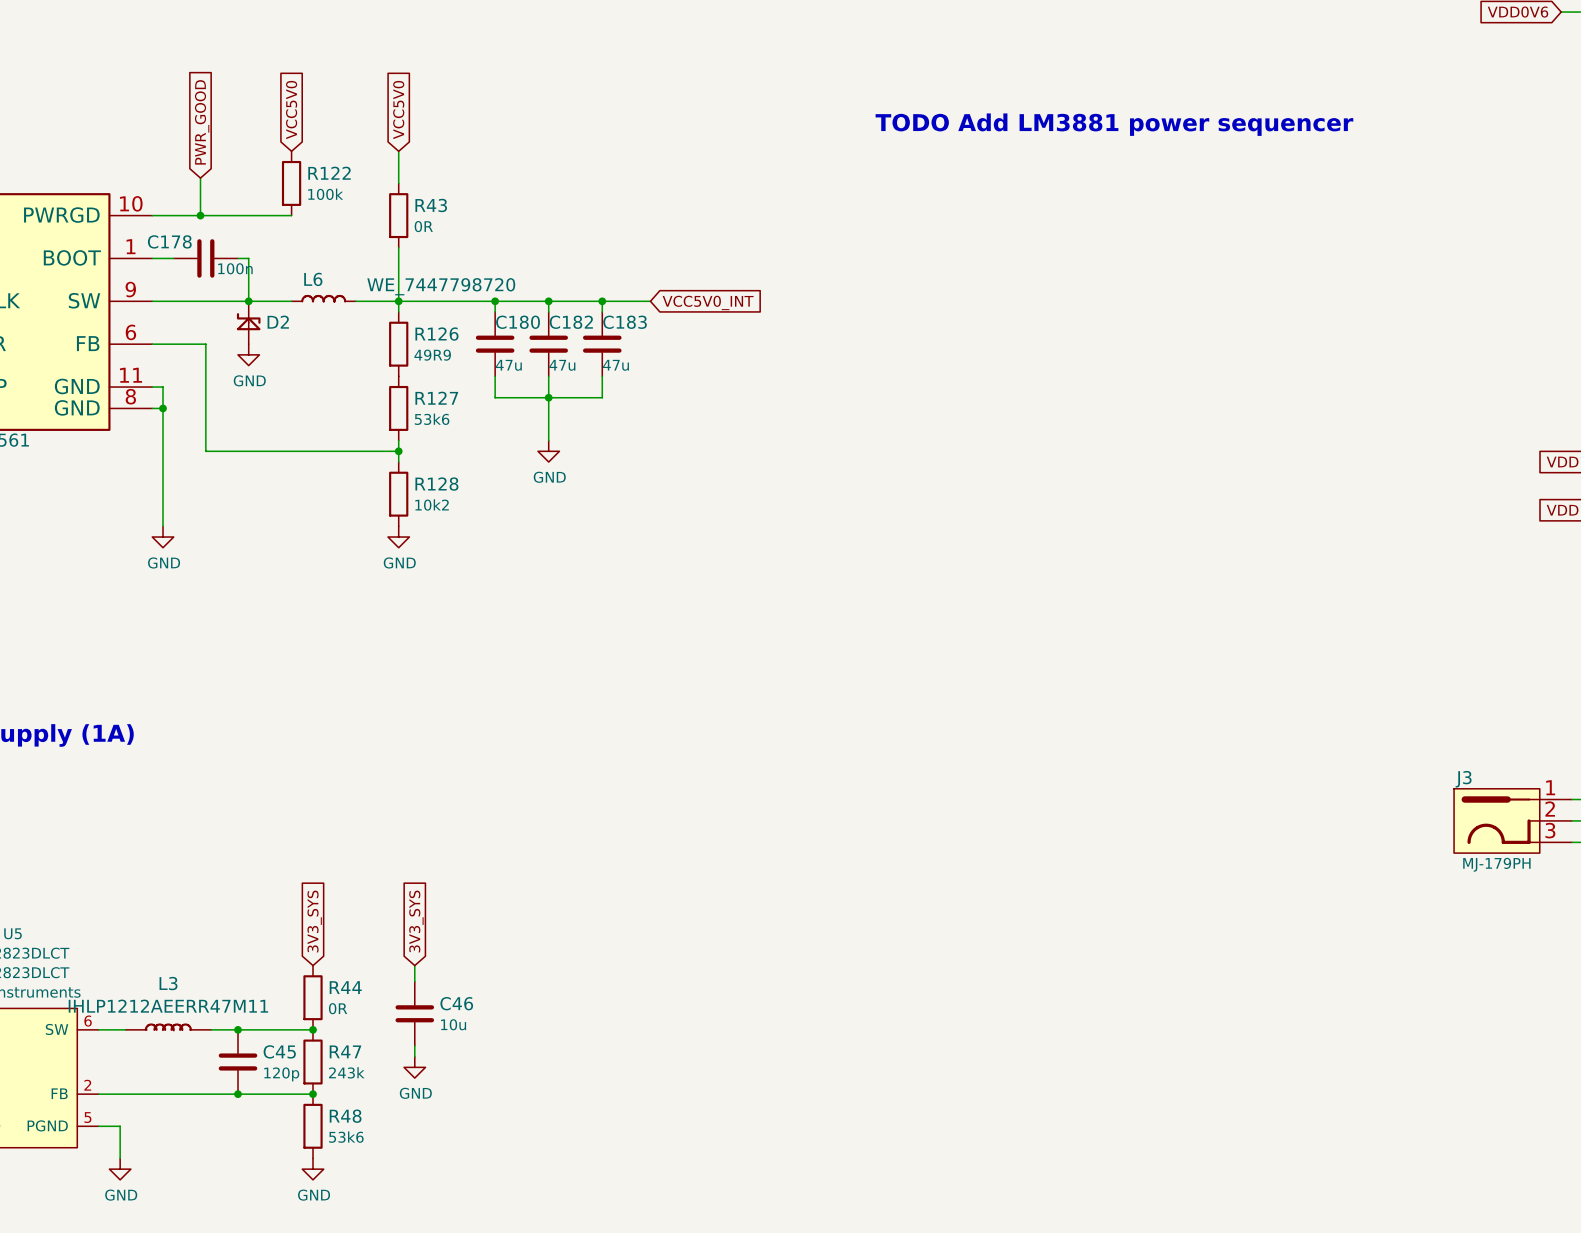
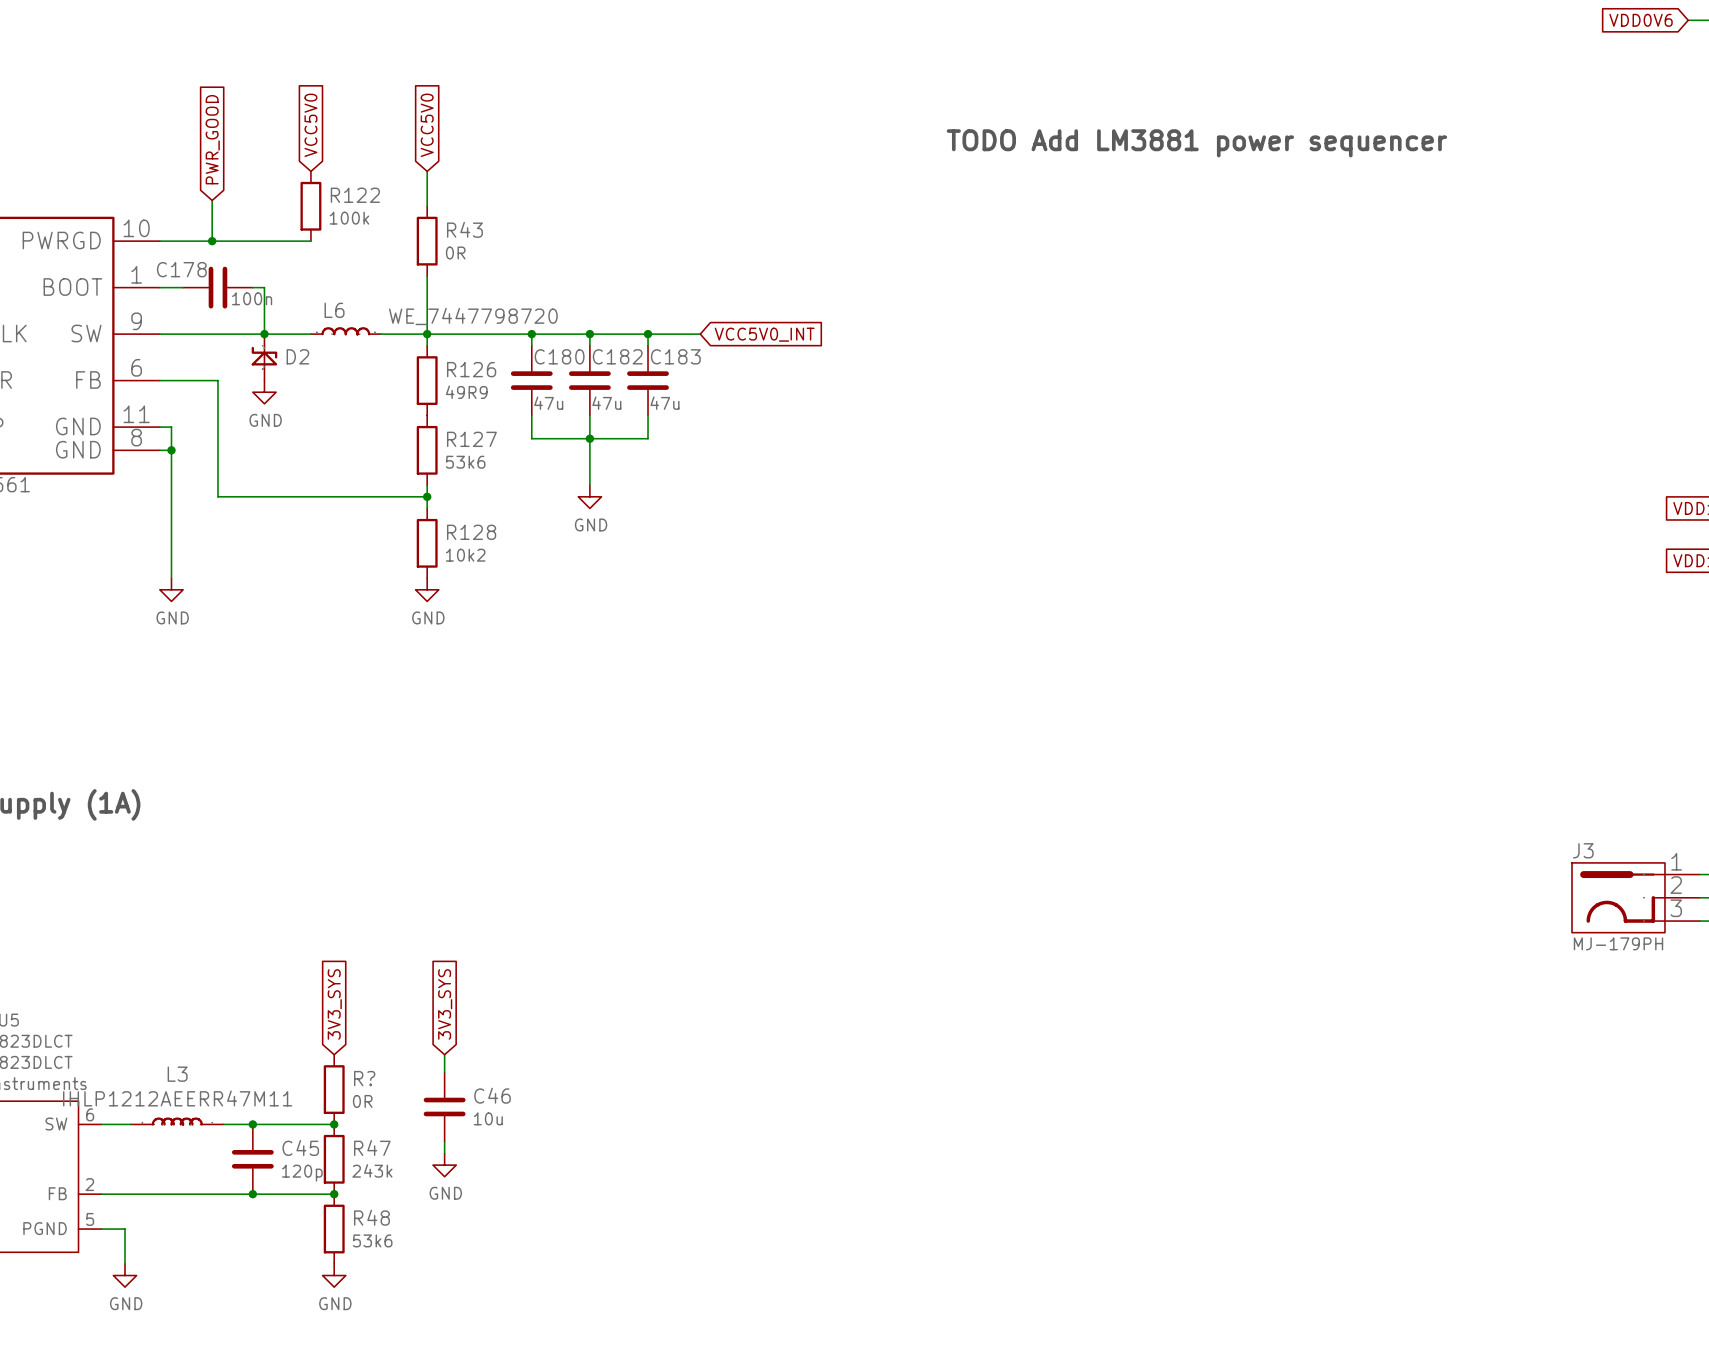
R44 name: R44 (345, 987) -> R? (364, 1078)

